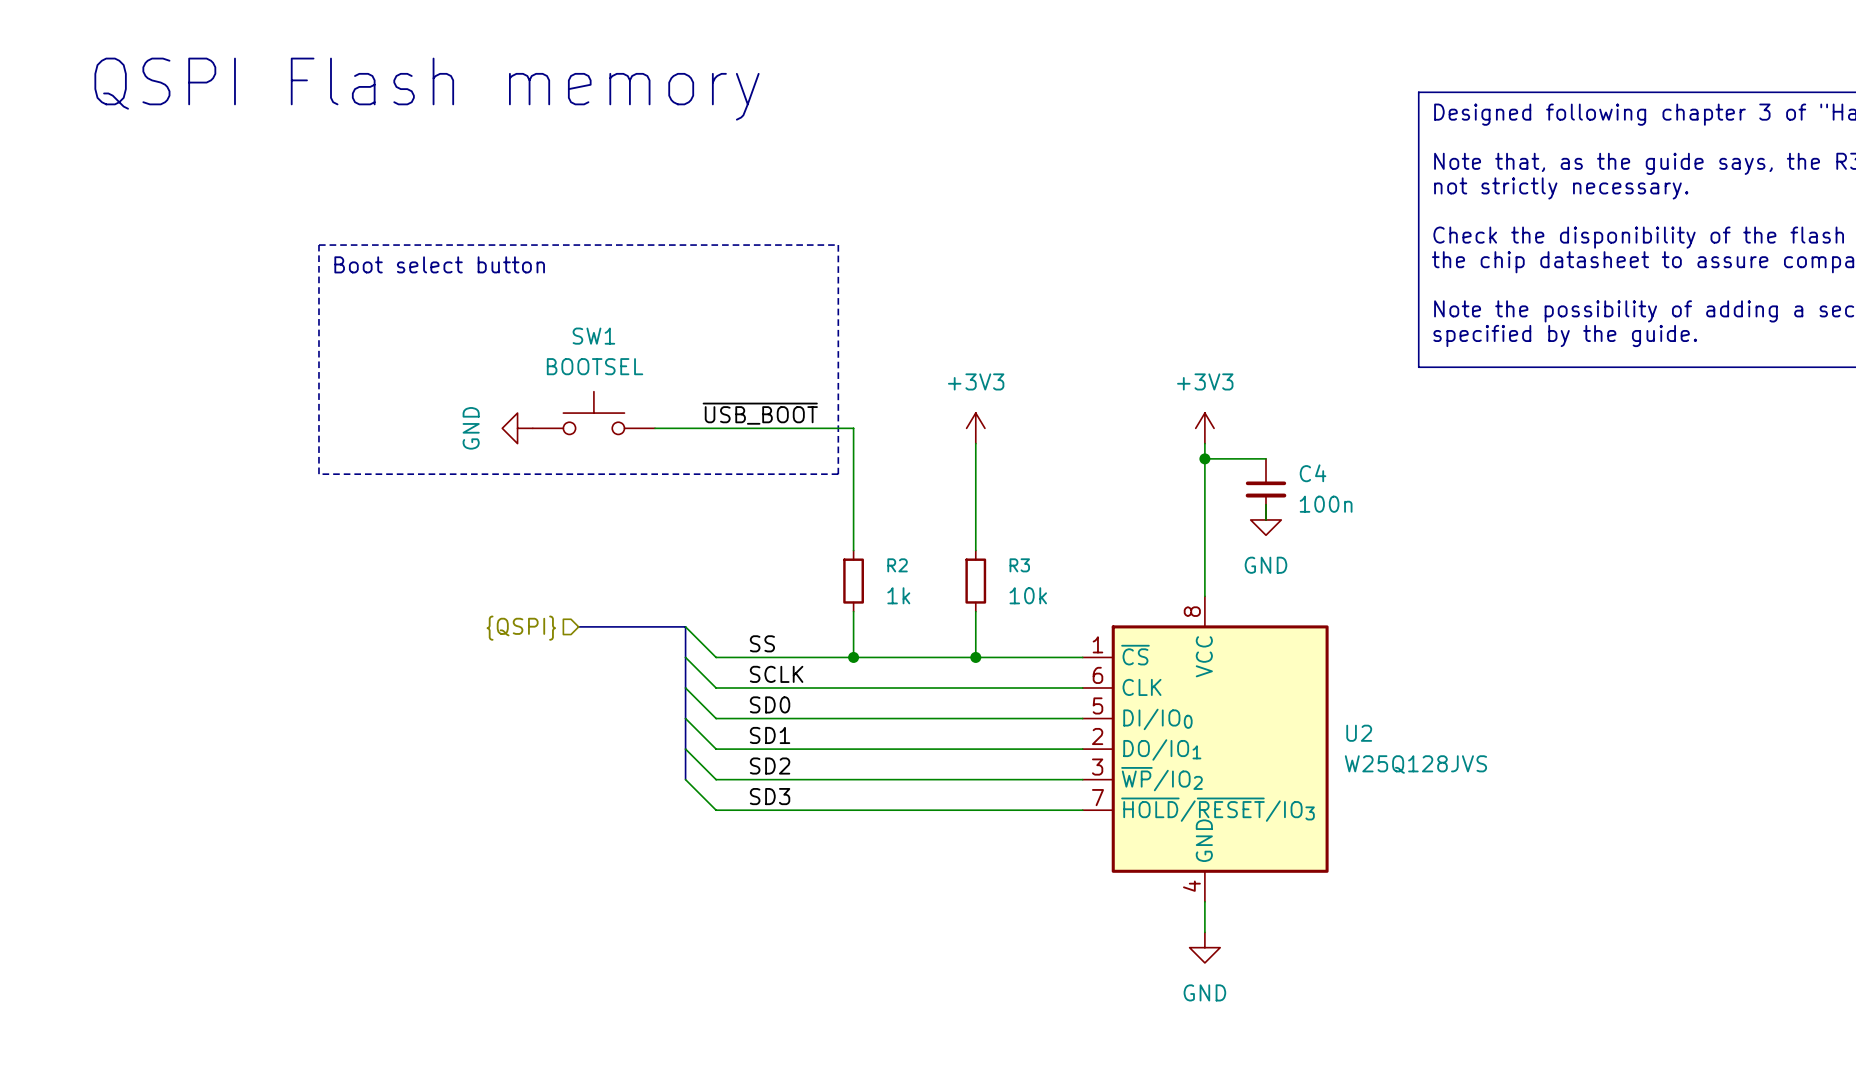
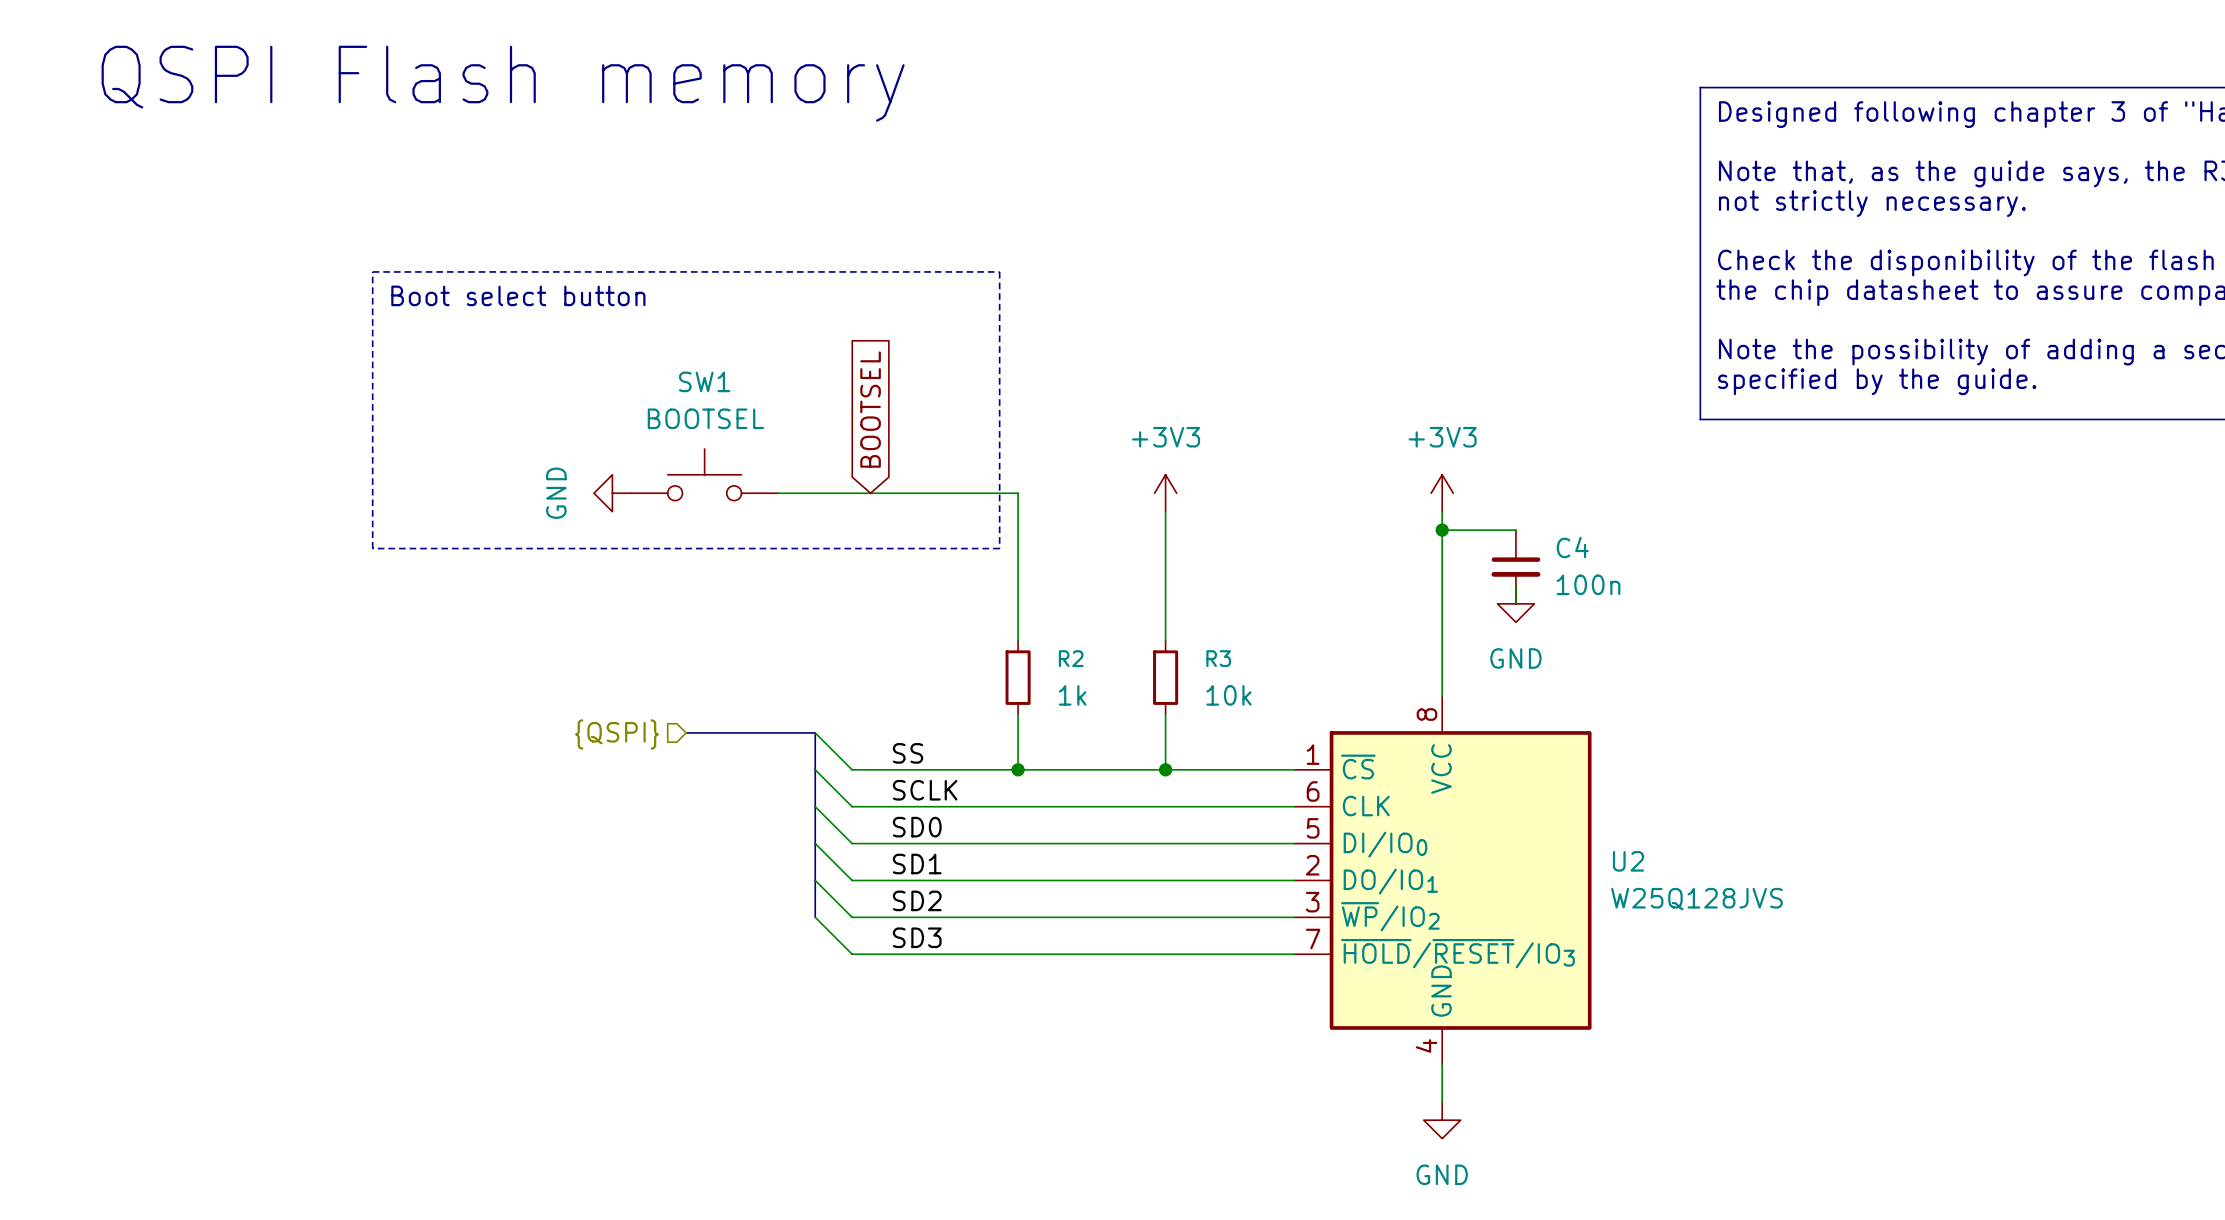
global label: none -> BOOTSEL (870, 409)
label: ~{USB_BOOT} (760, 413) -> none

